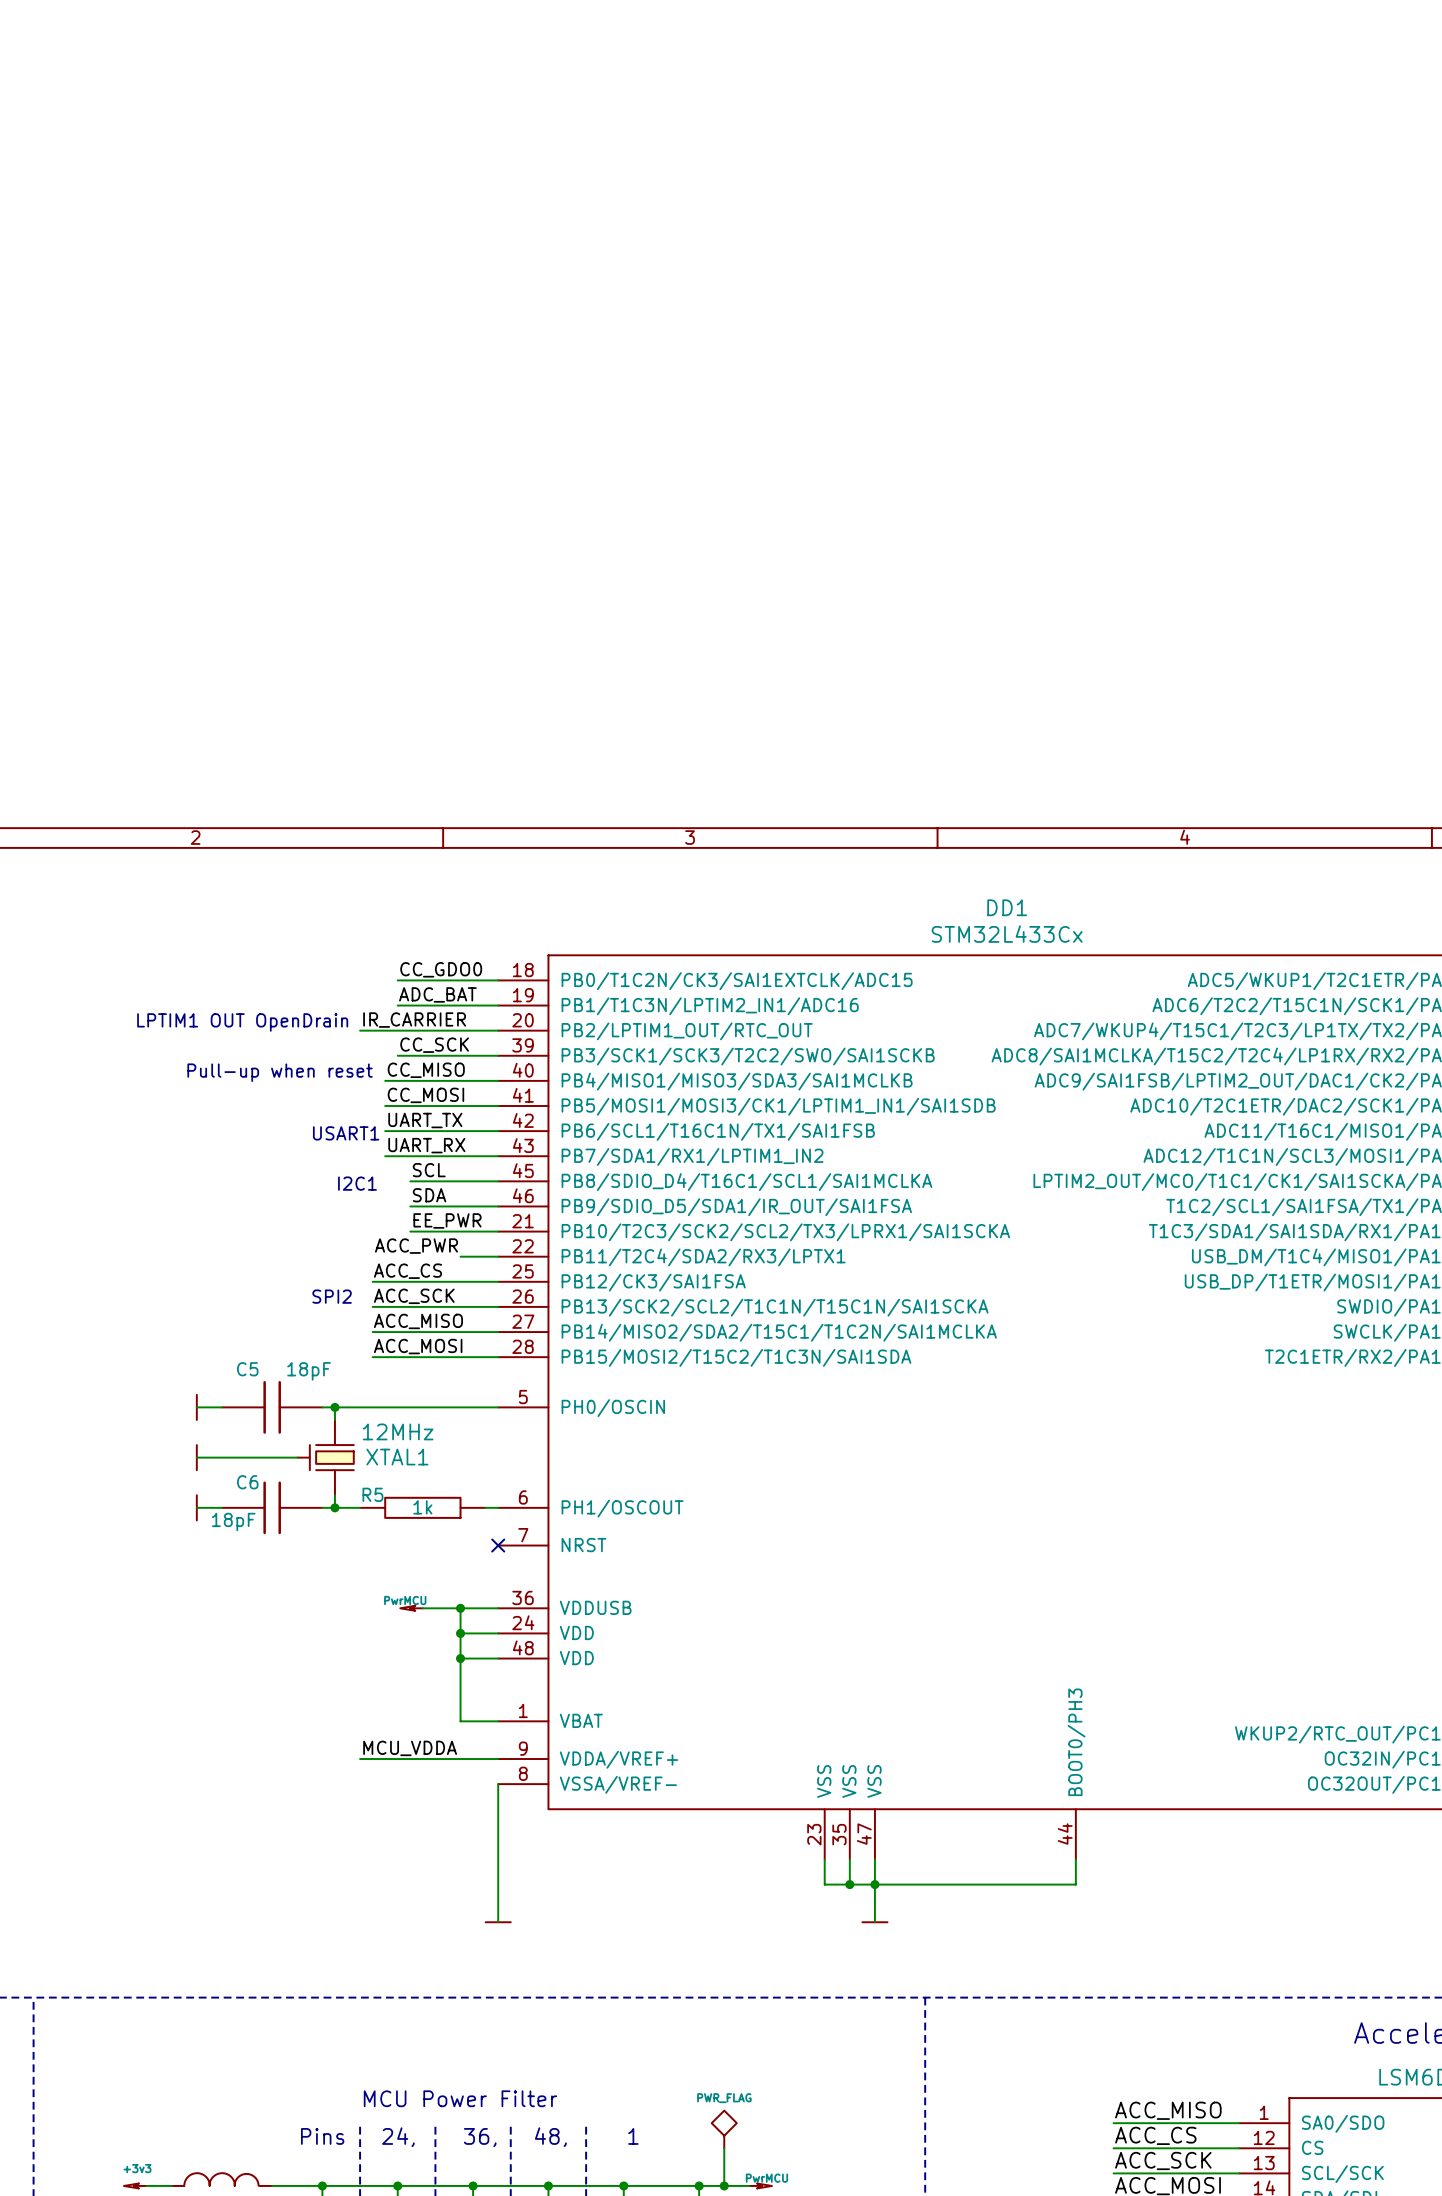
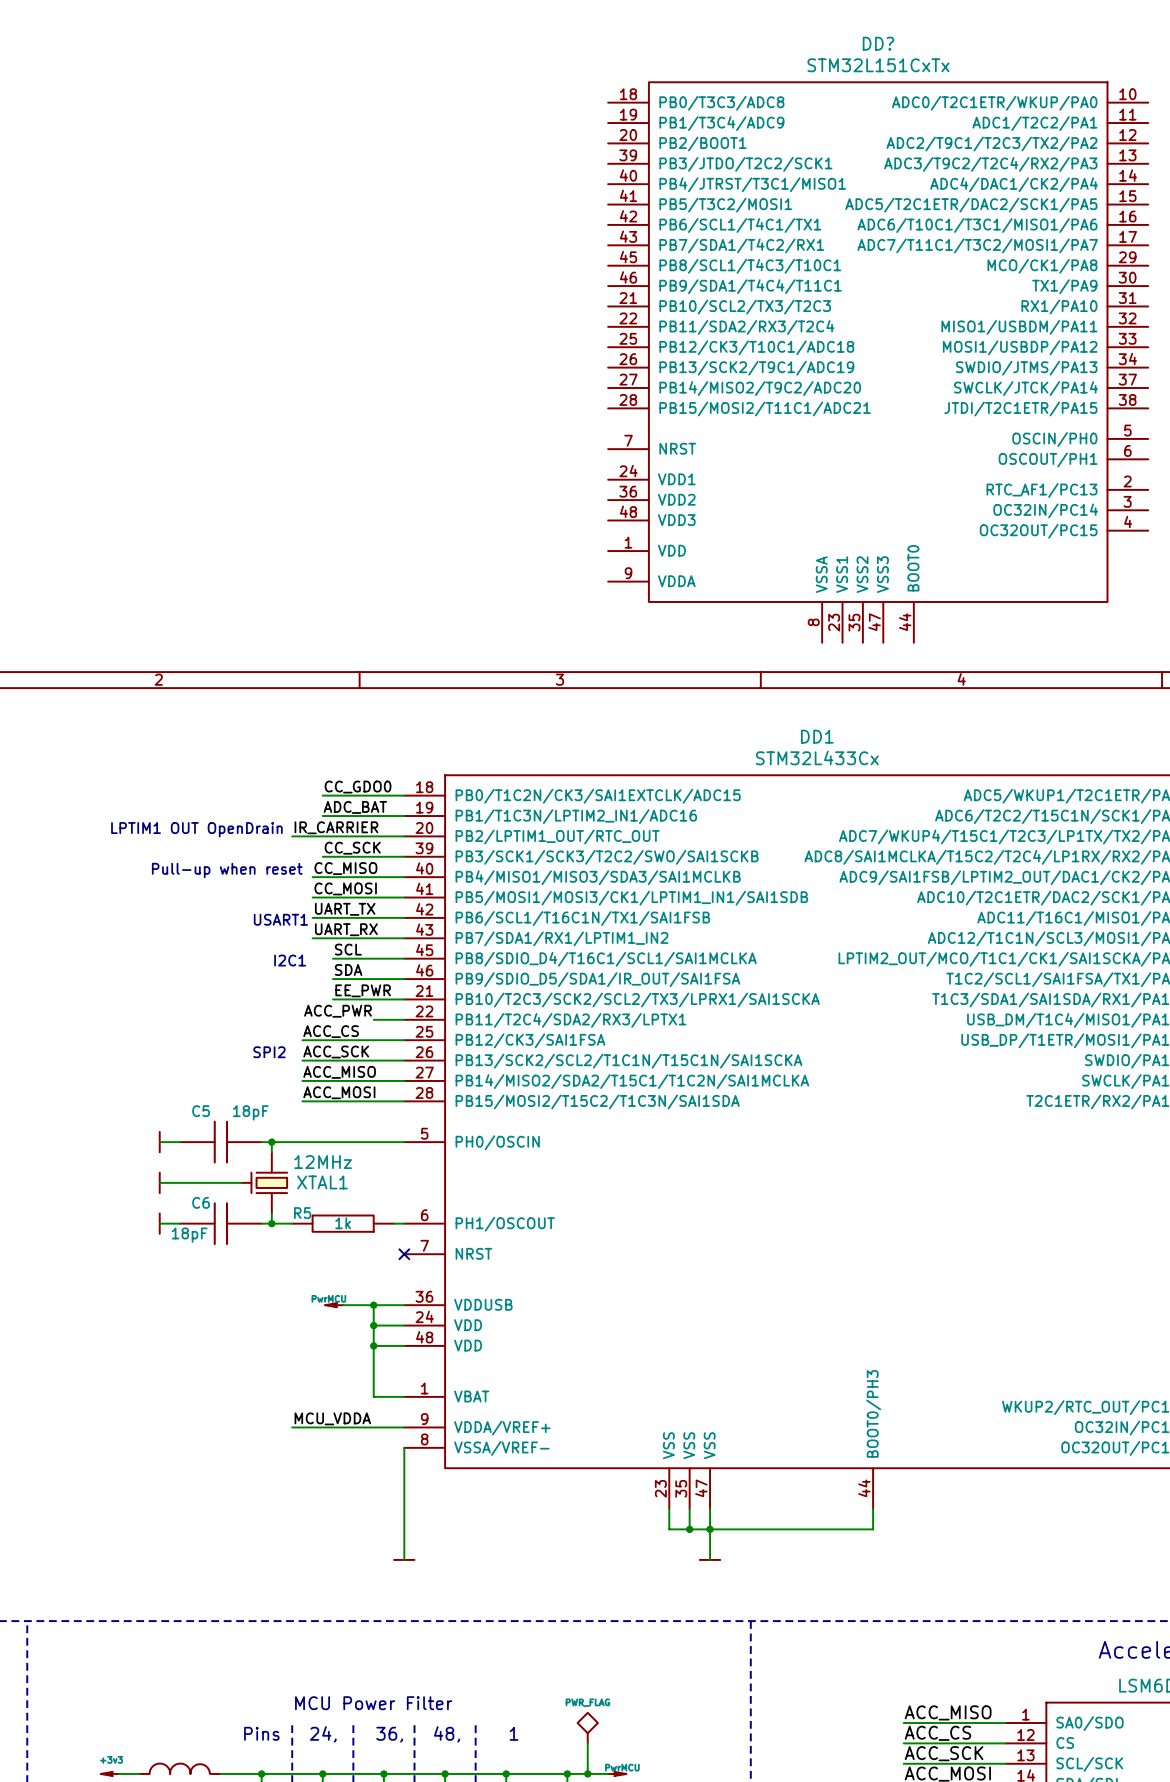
DD?: none -> STM32L151CxTx (878, 362)

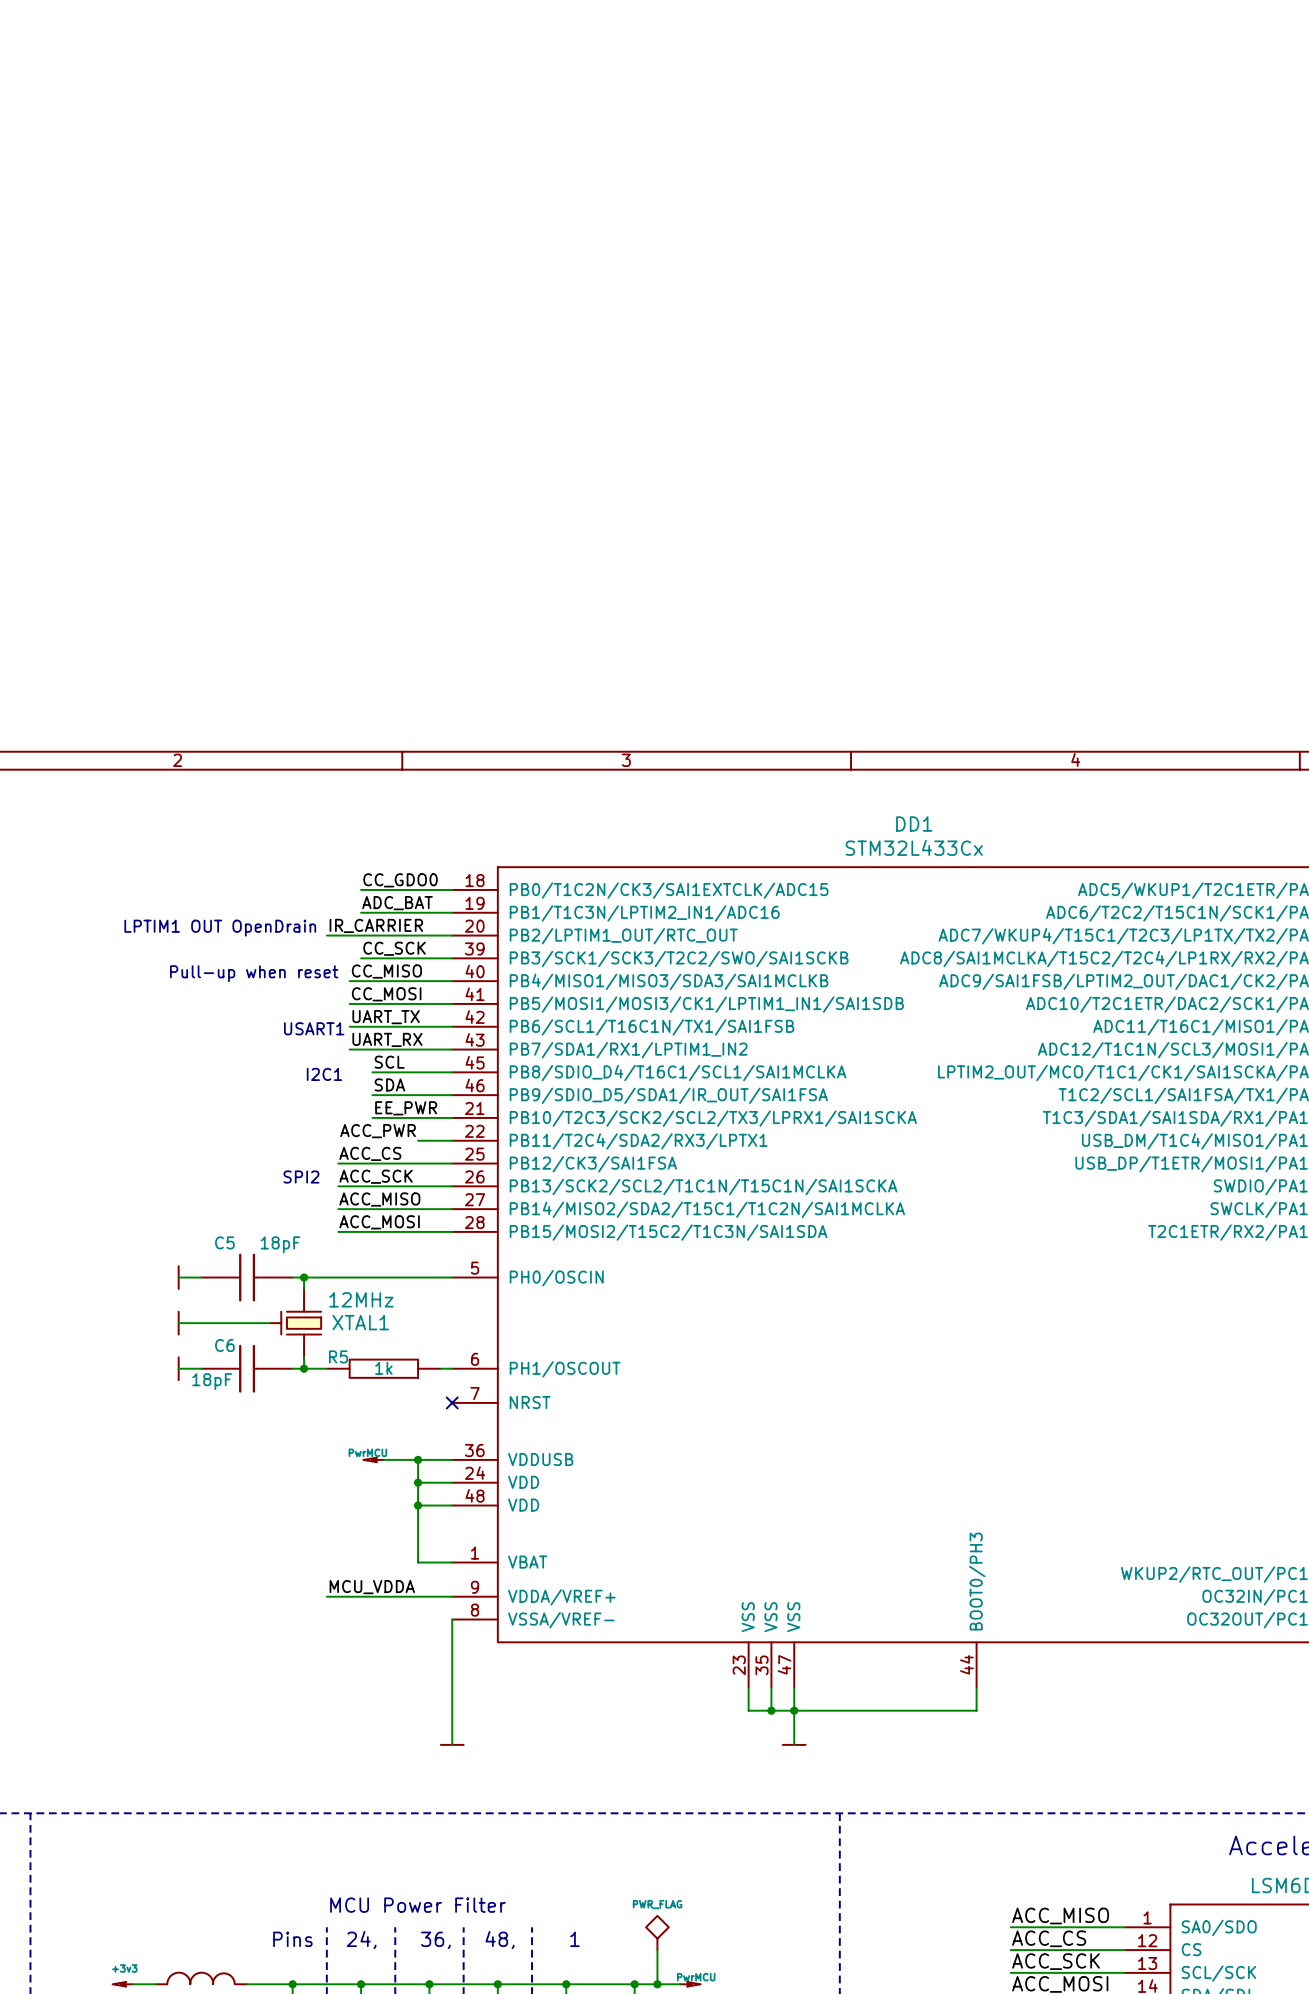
DD?: STM32L151CxTx (878, 362) -> none

